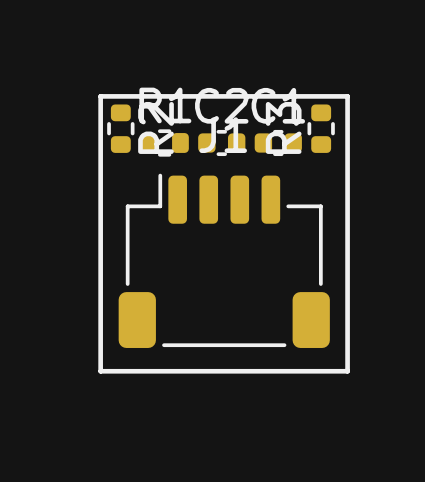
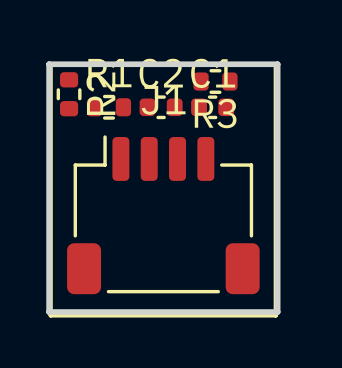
board edge: none -> (49, 64) (277, 64) (277, 312) (49, 312) (49, 64)
R3 rotation: 0° (321, 128) -> 90° clockwise (215, 81)
R3 position: (321, 128) -> (215, 81)

